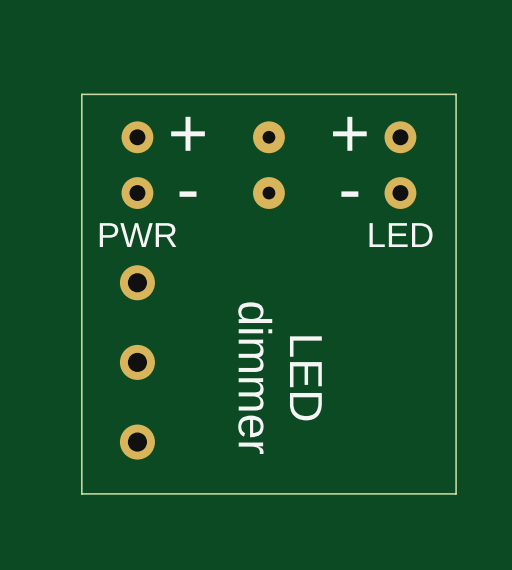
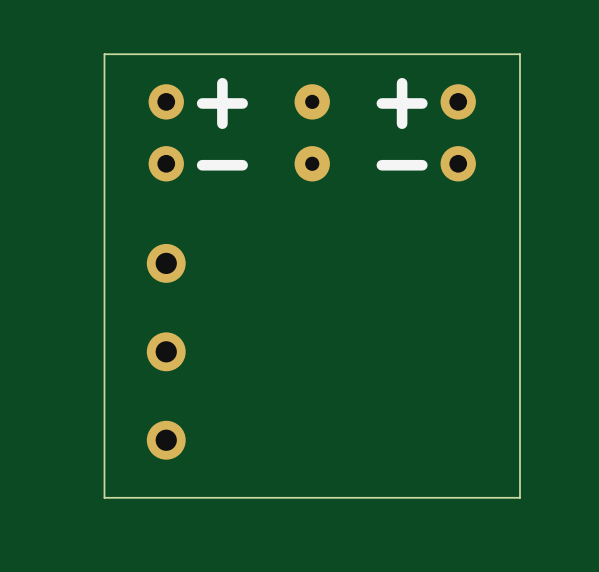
text: PWR (138, 235) -> none
text: LED (401, 235) -> none
text: dimmer (255, 378) -> none
text: LED (305, 378) -> none

